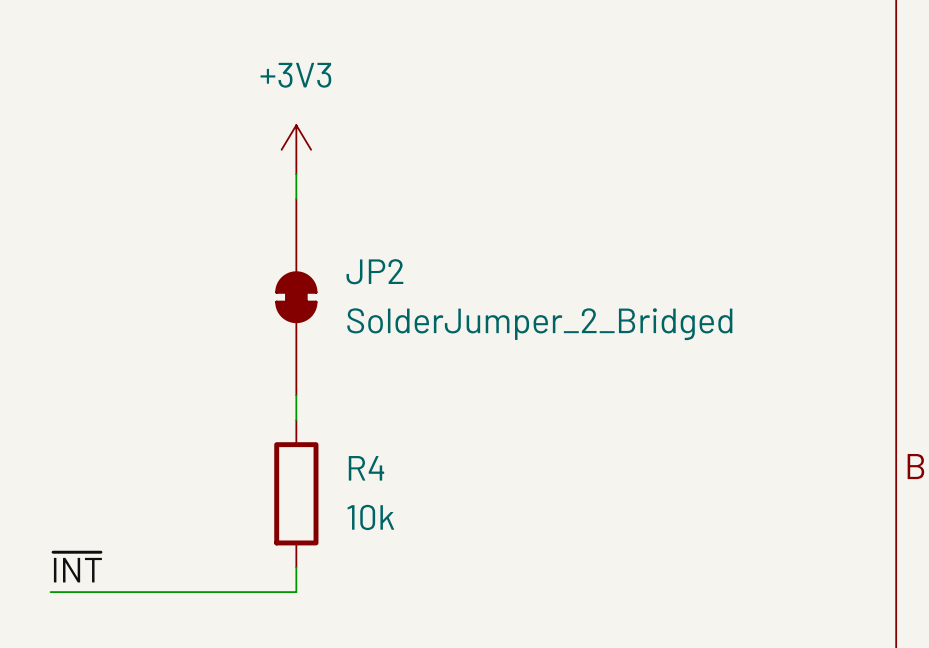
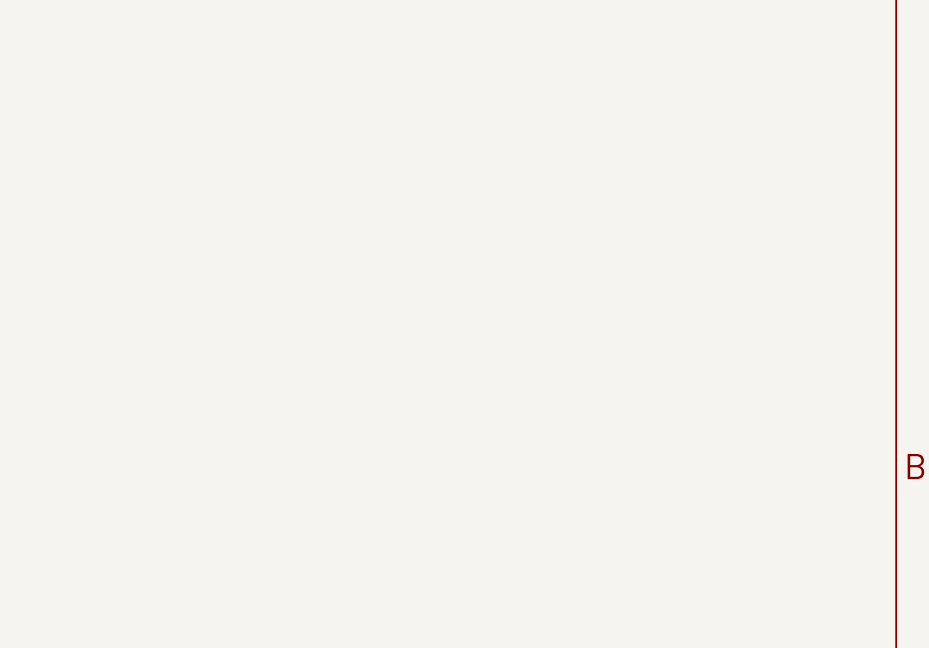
power symbol: +3V3 (296, 149) -> none
wire: (296, 174) (296, 198) -> none
JP2: SolderJumper_2_Bridged (296, 297) -> none
wire: (296, 395) (296, 420) -> none
R4: 10k (296, 493) -> none
label: ~{INT} (77, 567) -> none
wire: (296, 567) (296, 592) (50, 592) -> none

